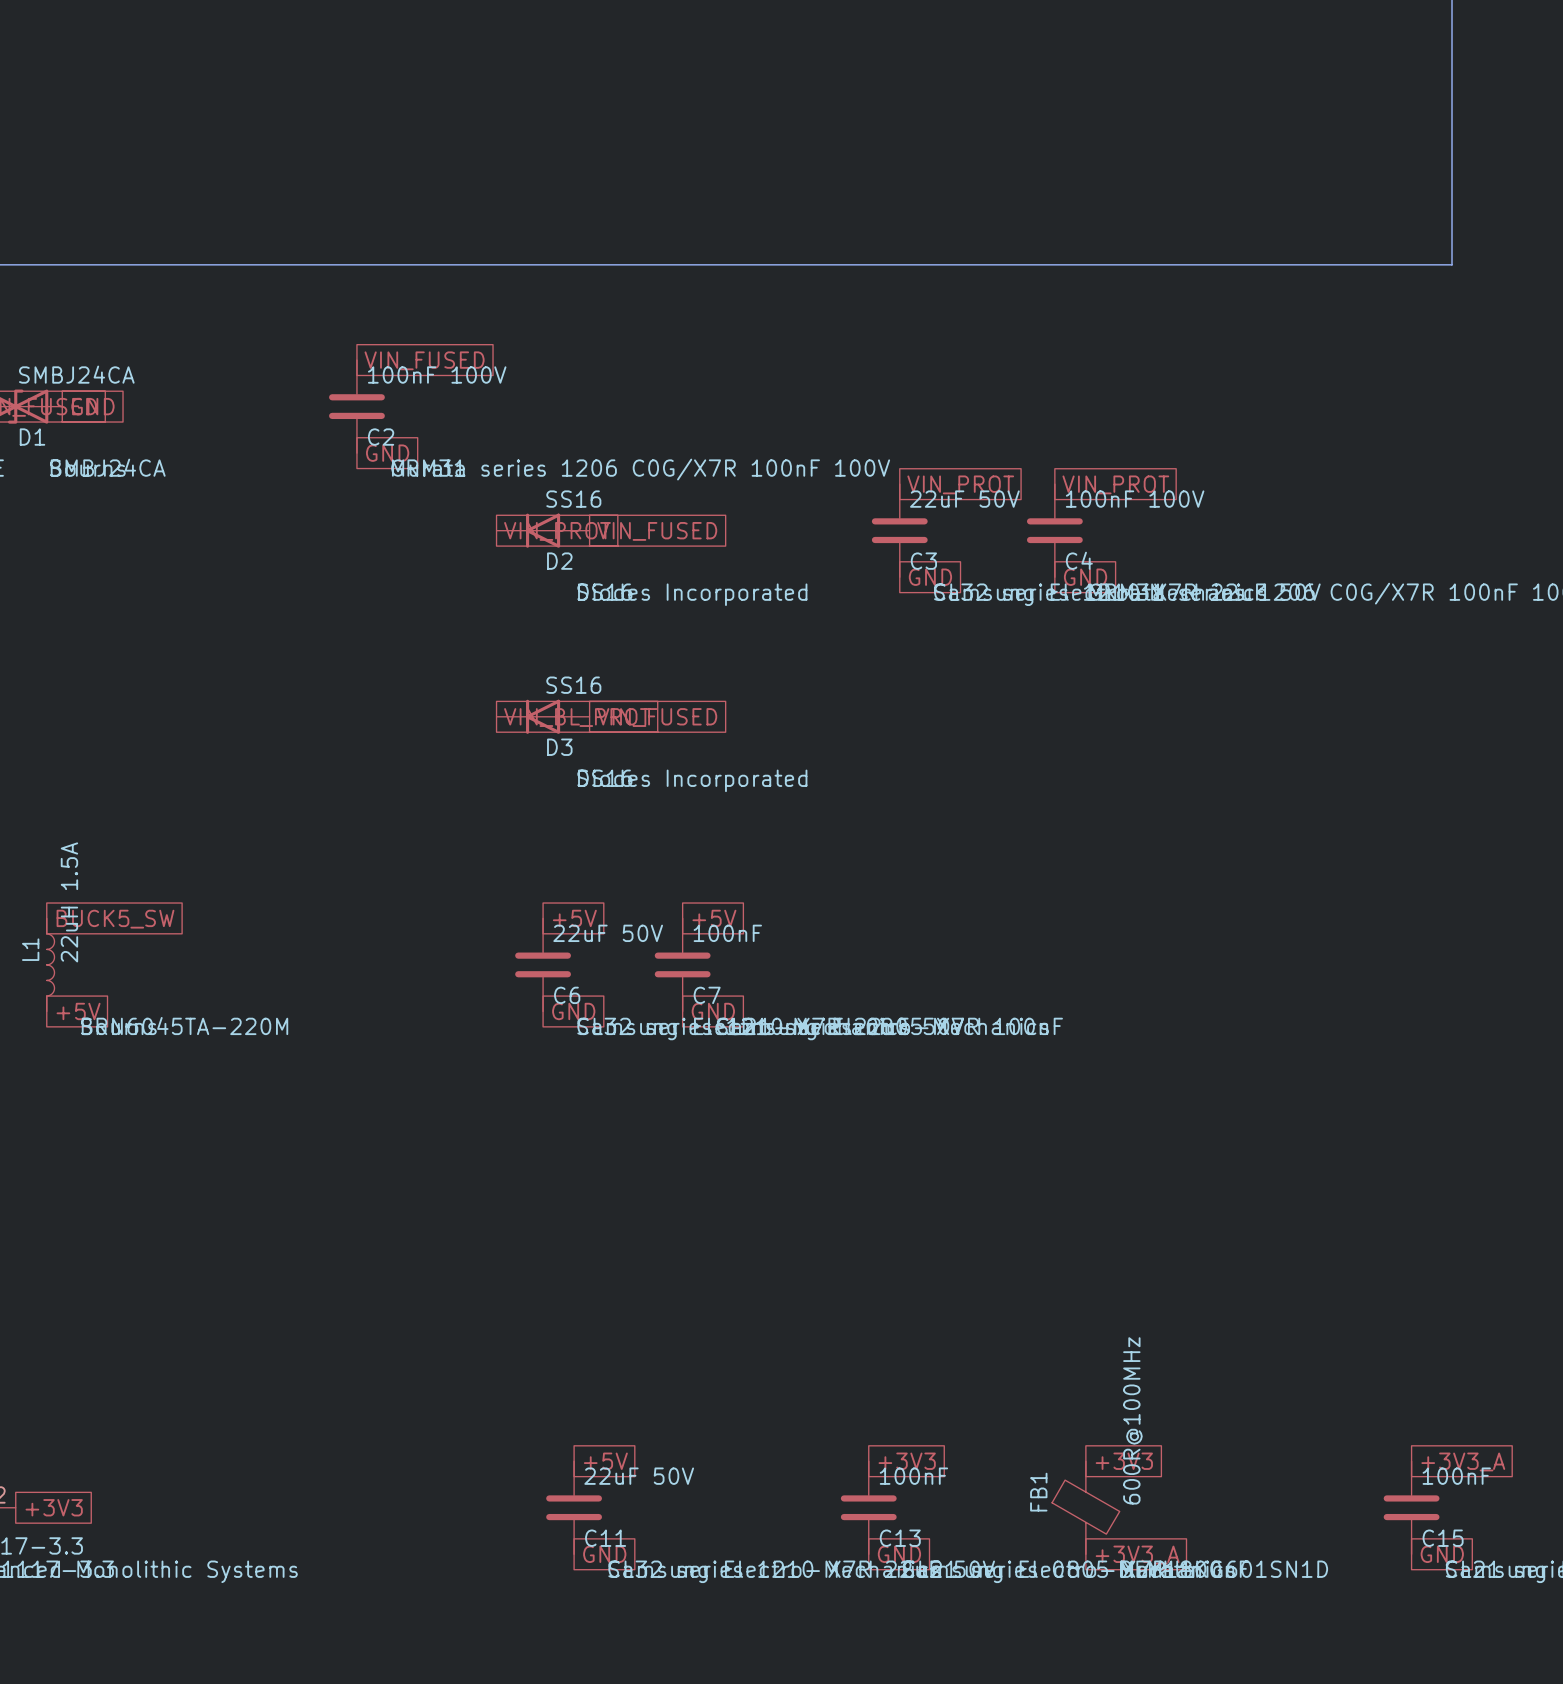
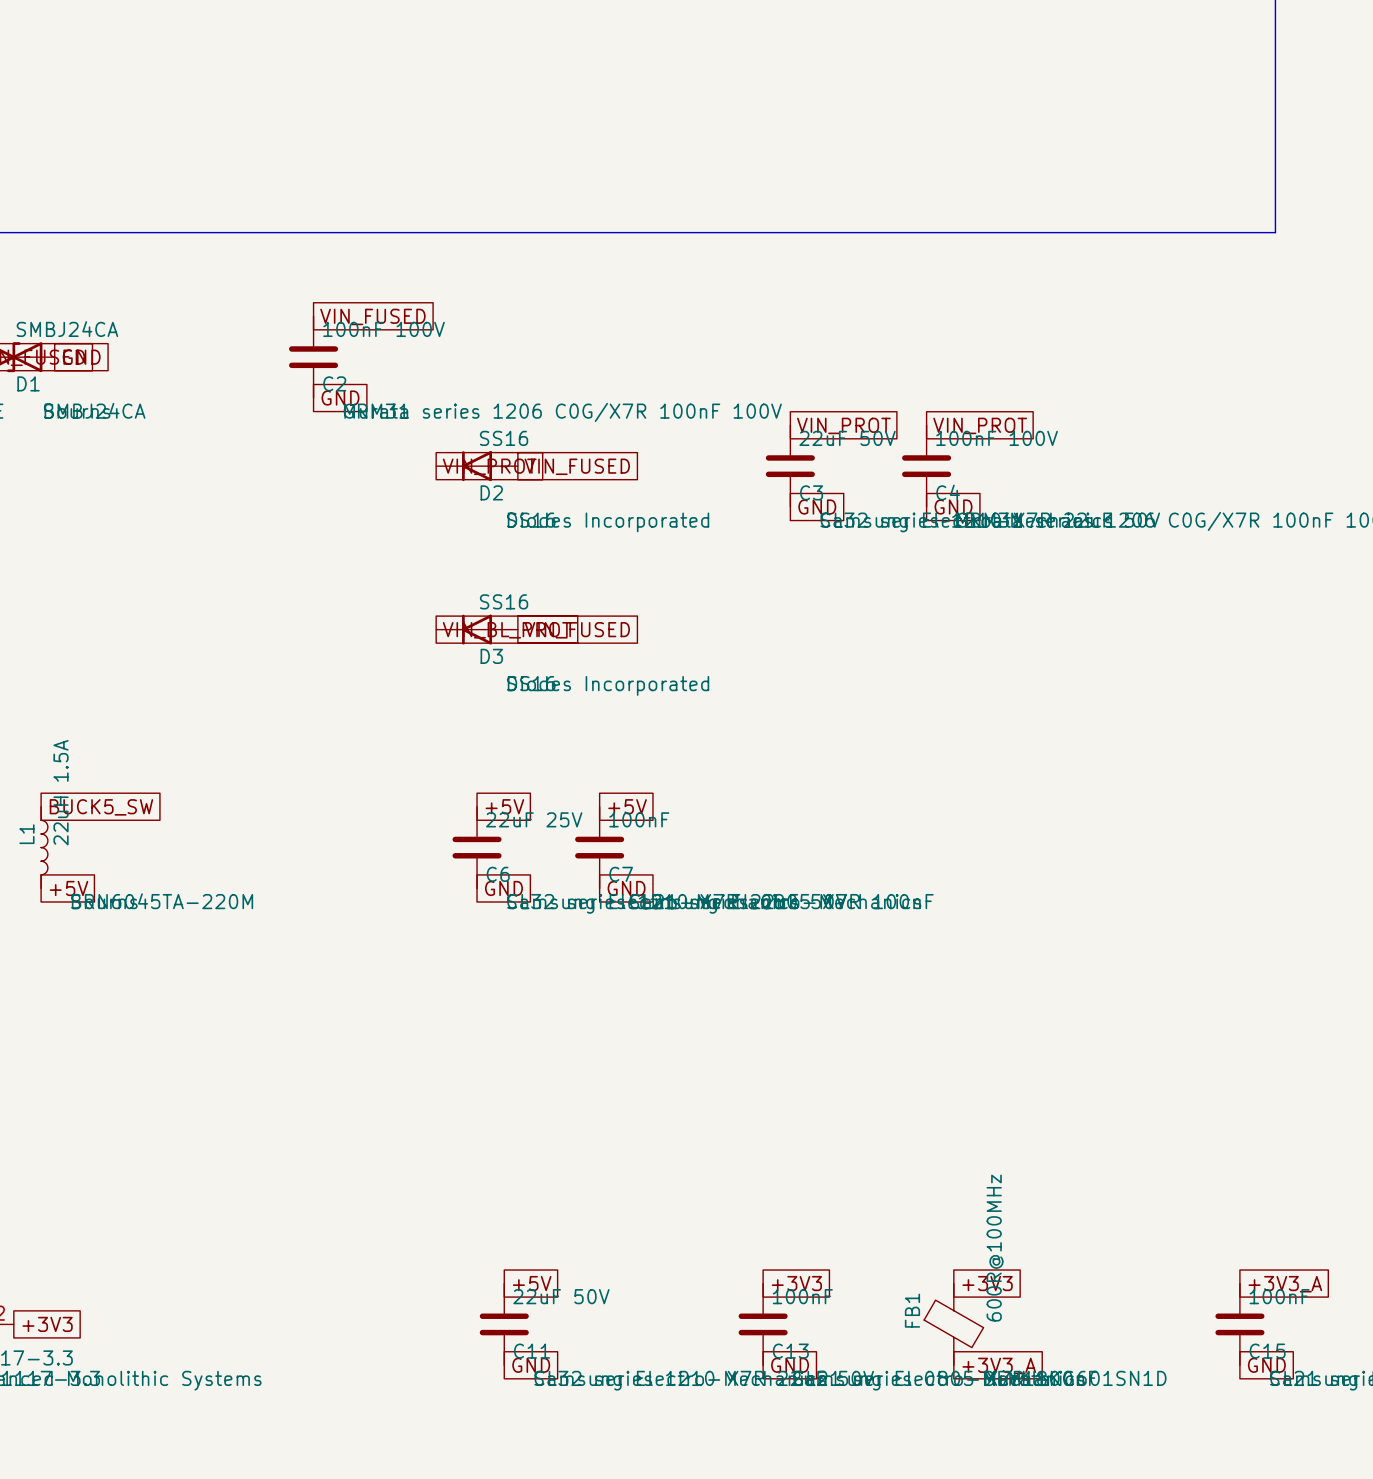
C6 value: 22uF 50V (608, 933) -> 22uF 25V (534, 819)

